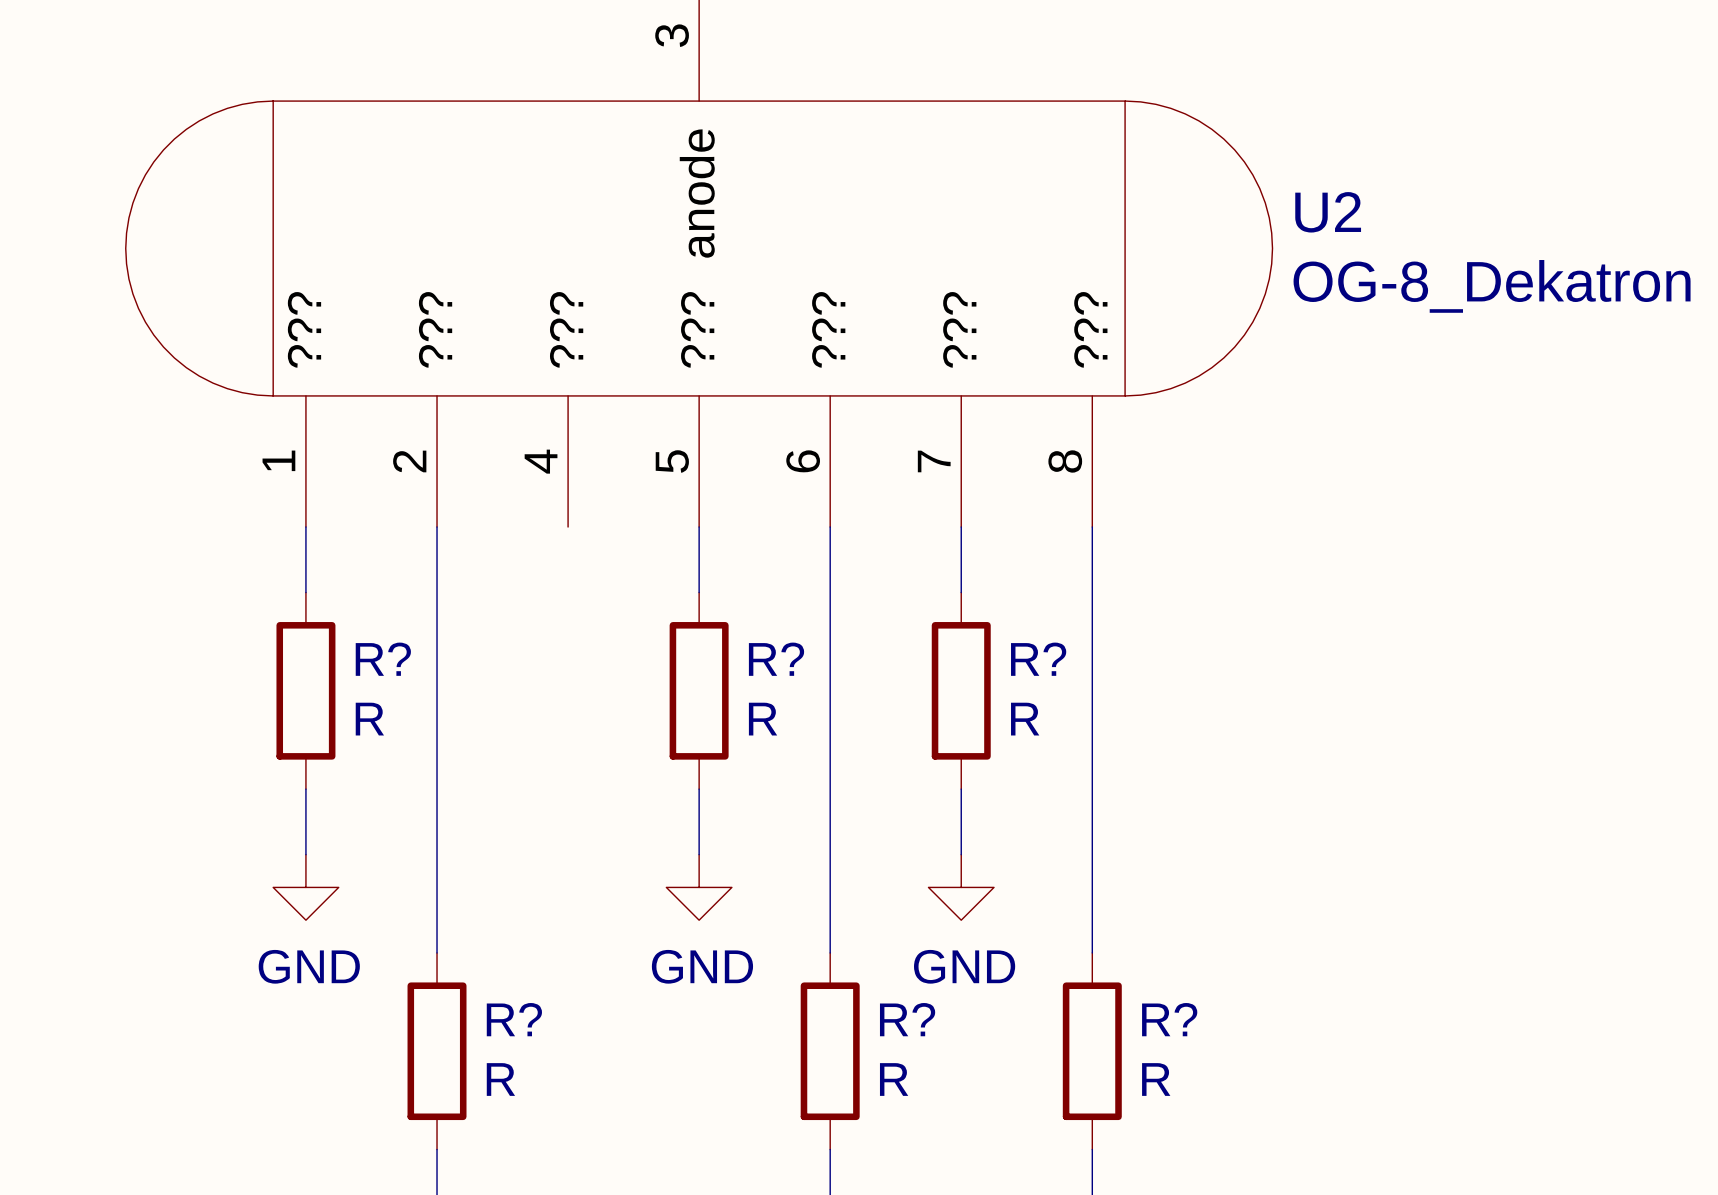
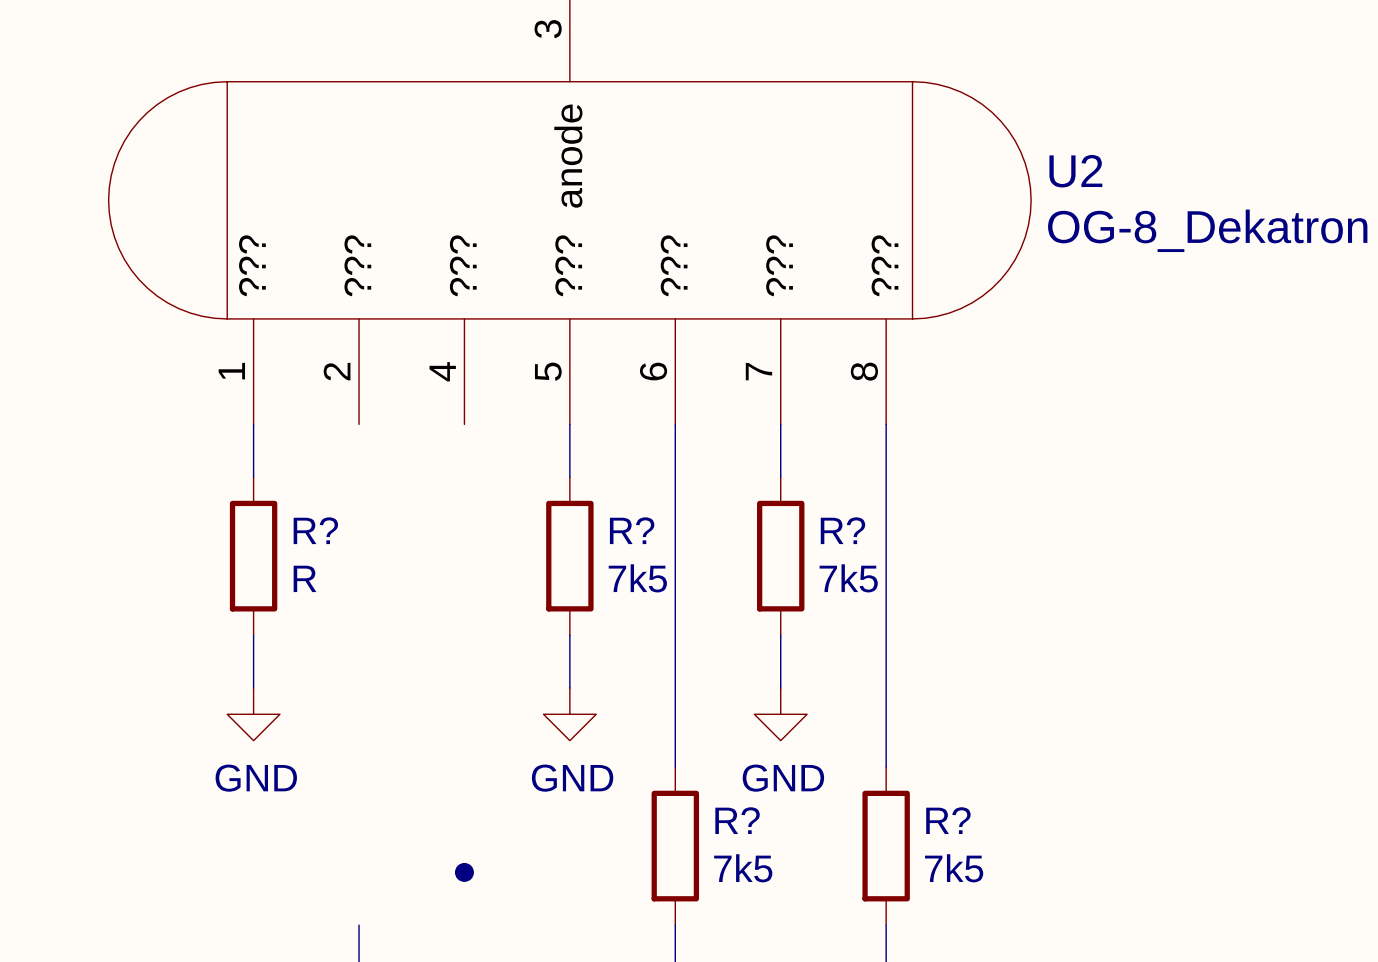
wire: (437, 527) (437, 952) -> none
R? value: R (763, 719) -> 7k5 (637, 578)
R? value: R (1025, 719) -> 7k5 (848, 578)
R?: R (437, 1051) -> none
R? value: R (894, 1079) -> 7k5 (743, 868)
R? value: R (1156, 1079) -> 7k5 (954, 868)
junction: none -> (464, 872)

